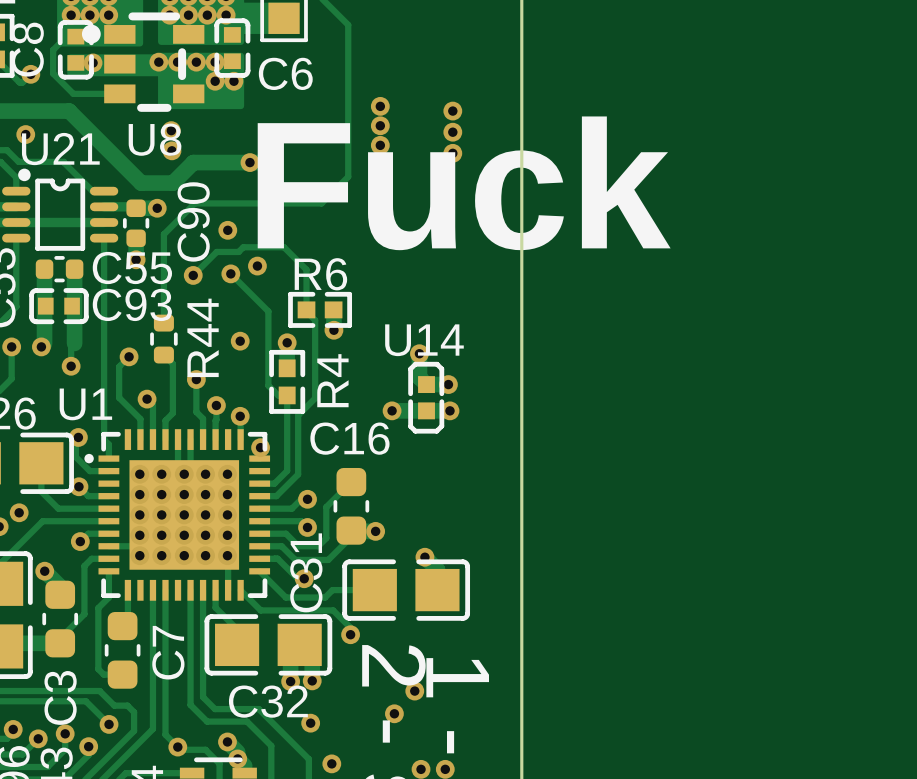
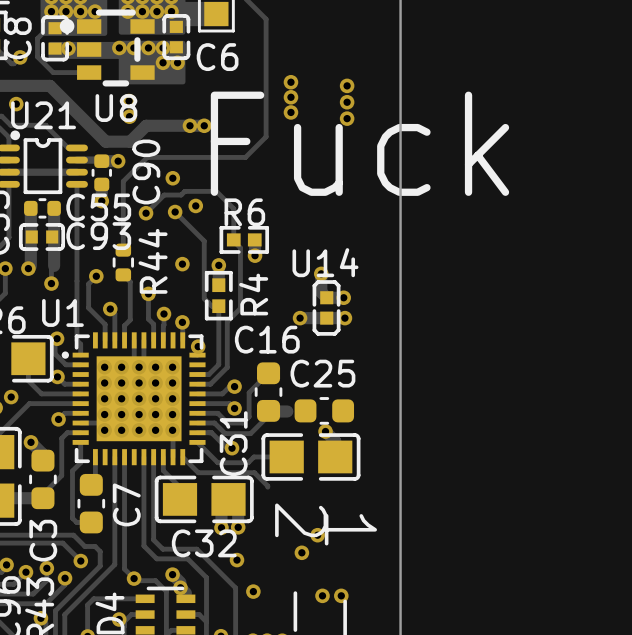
via: none -> (95, 11)
C25: none -> (324, 410)
via: (375, 531) -> none
via: (350, 634) -> none

